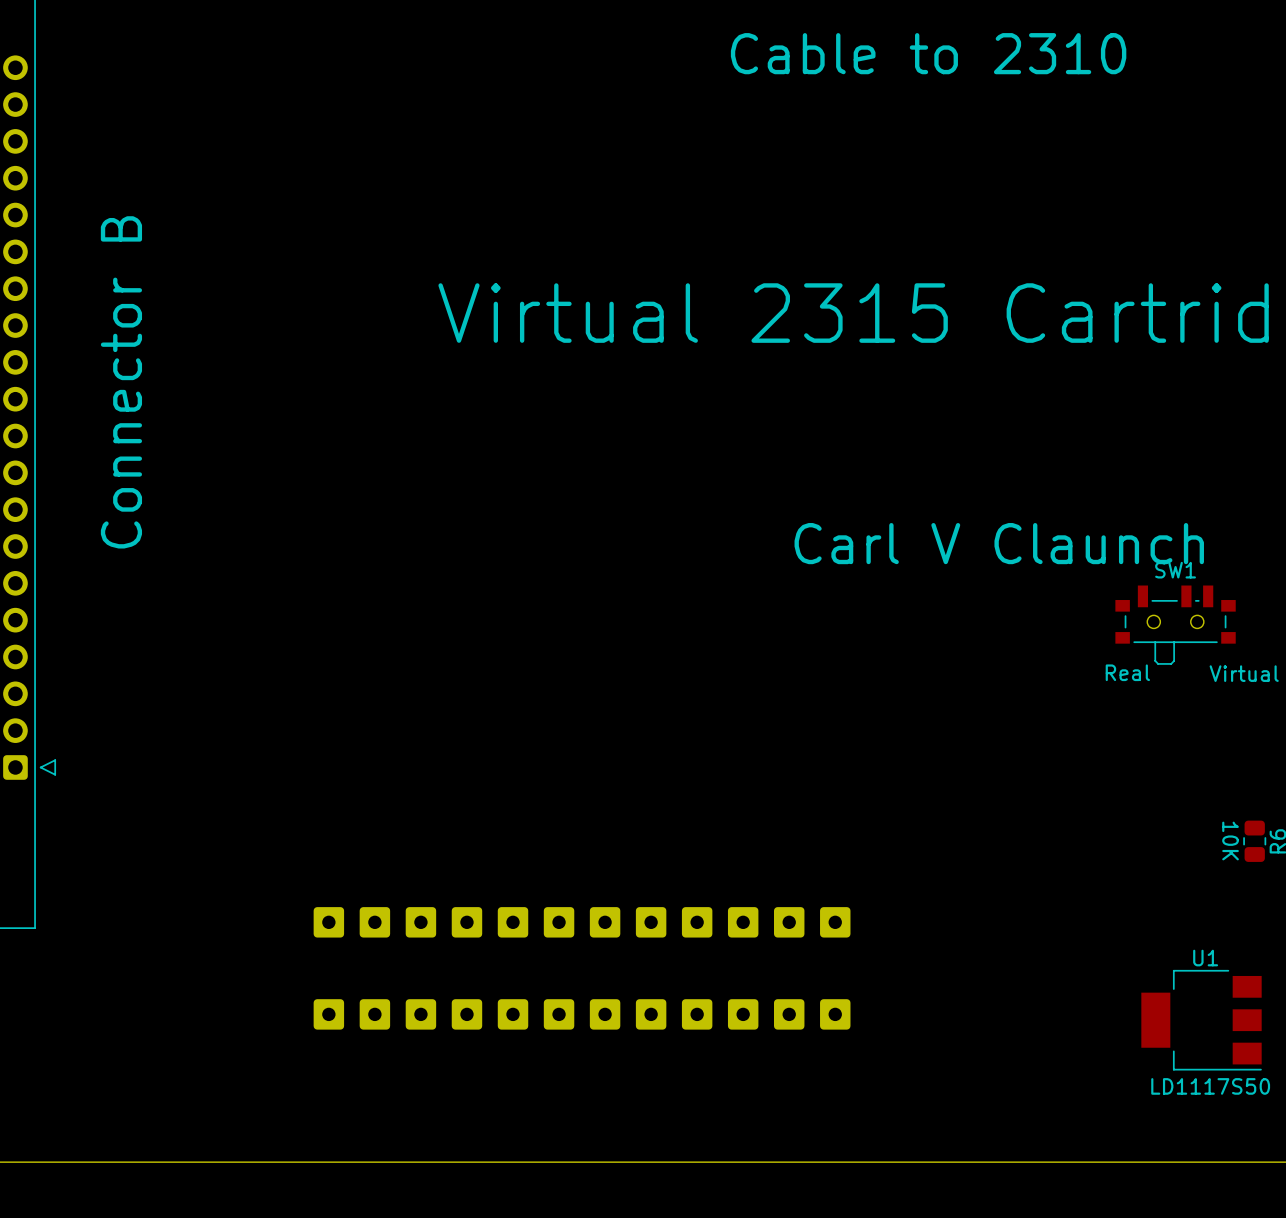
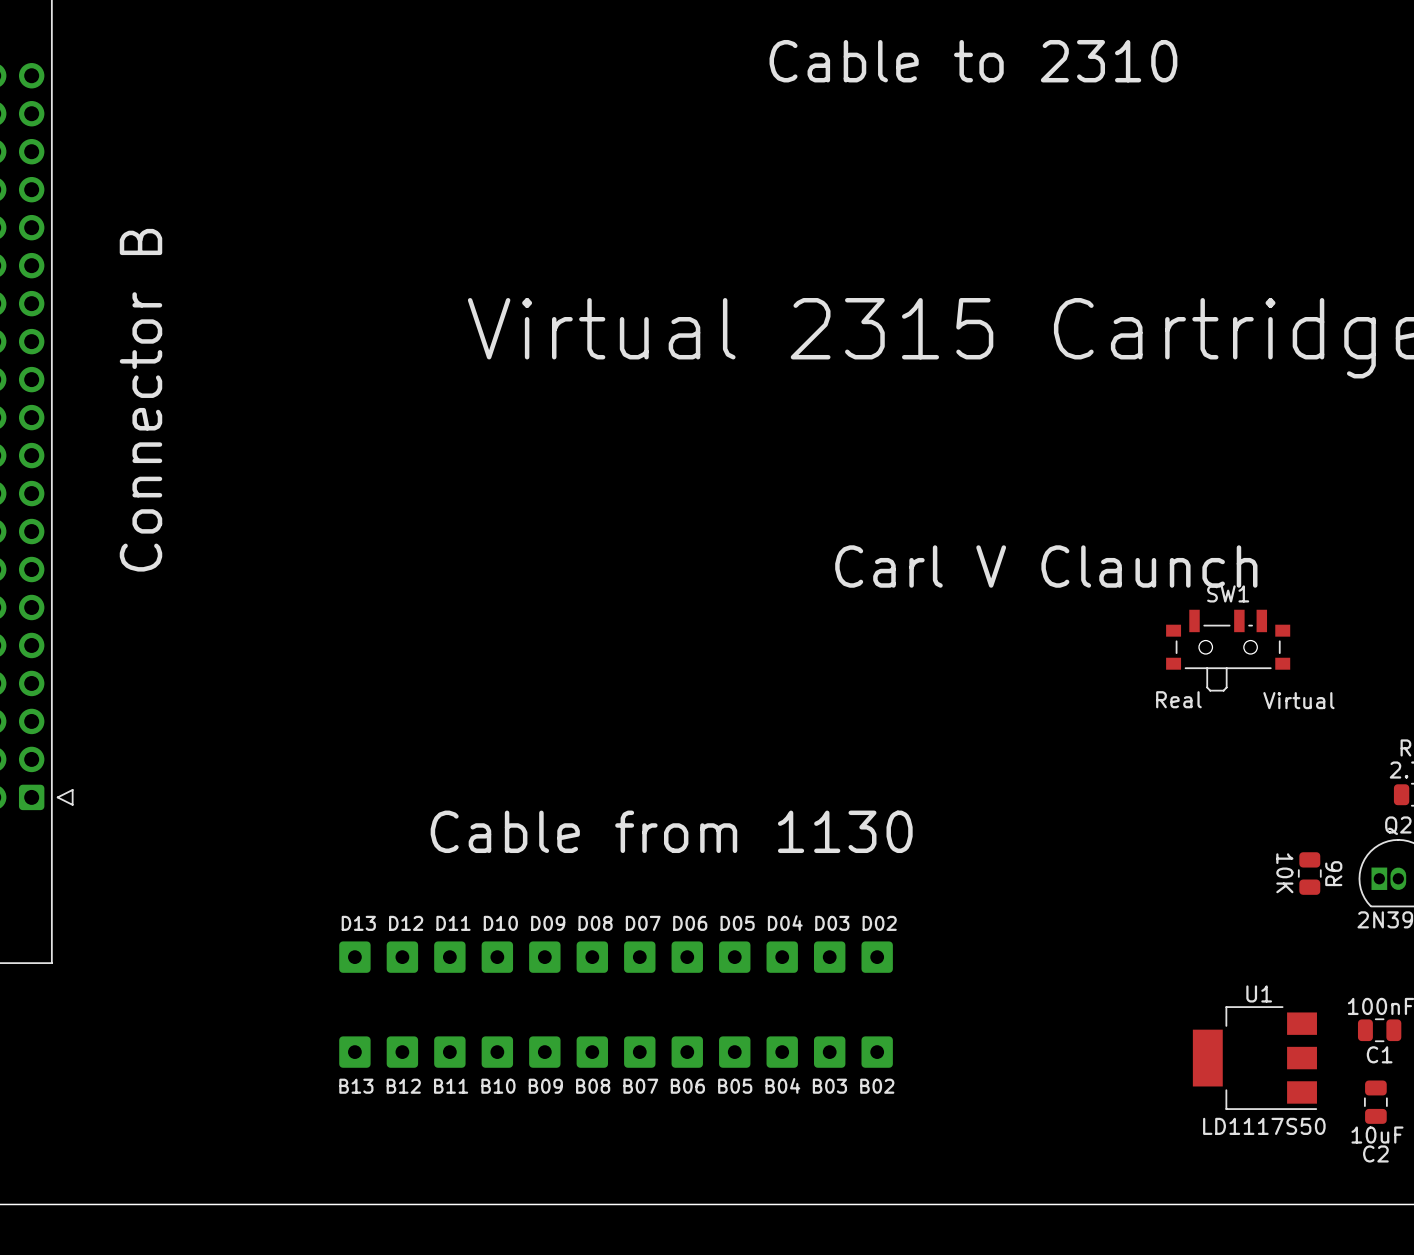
text: none -> Cable from 1130 (671, 831)
text: none -> D13 D12 D11 D10 D09 D08 D07 D06 D05 D04 D03 D02 (619, 923)
text: none -> B13 B12 B11 B10 B09 B08 B07 B06 B05 B04 B03 B02 (616, 1085)

